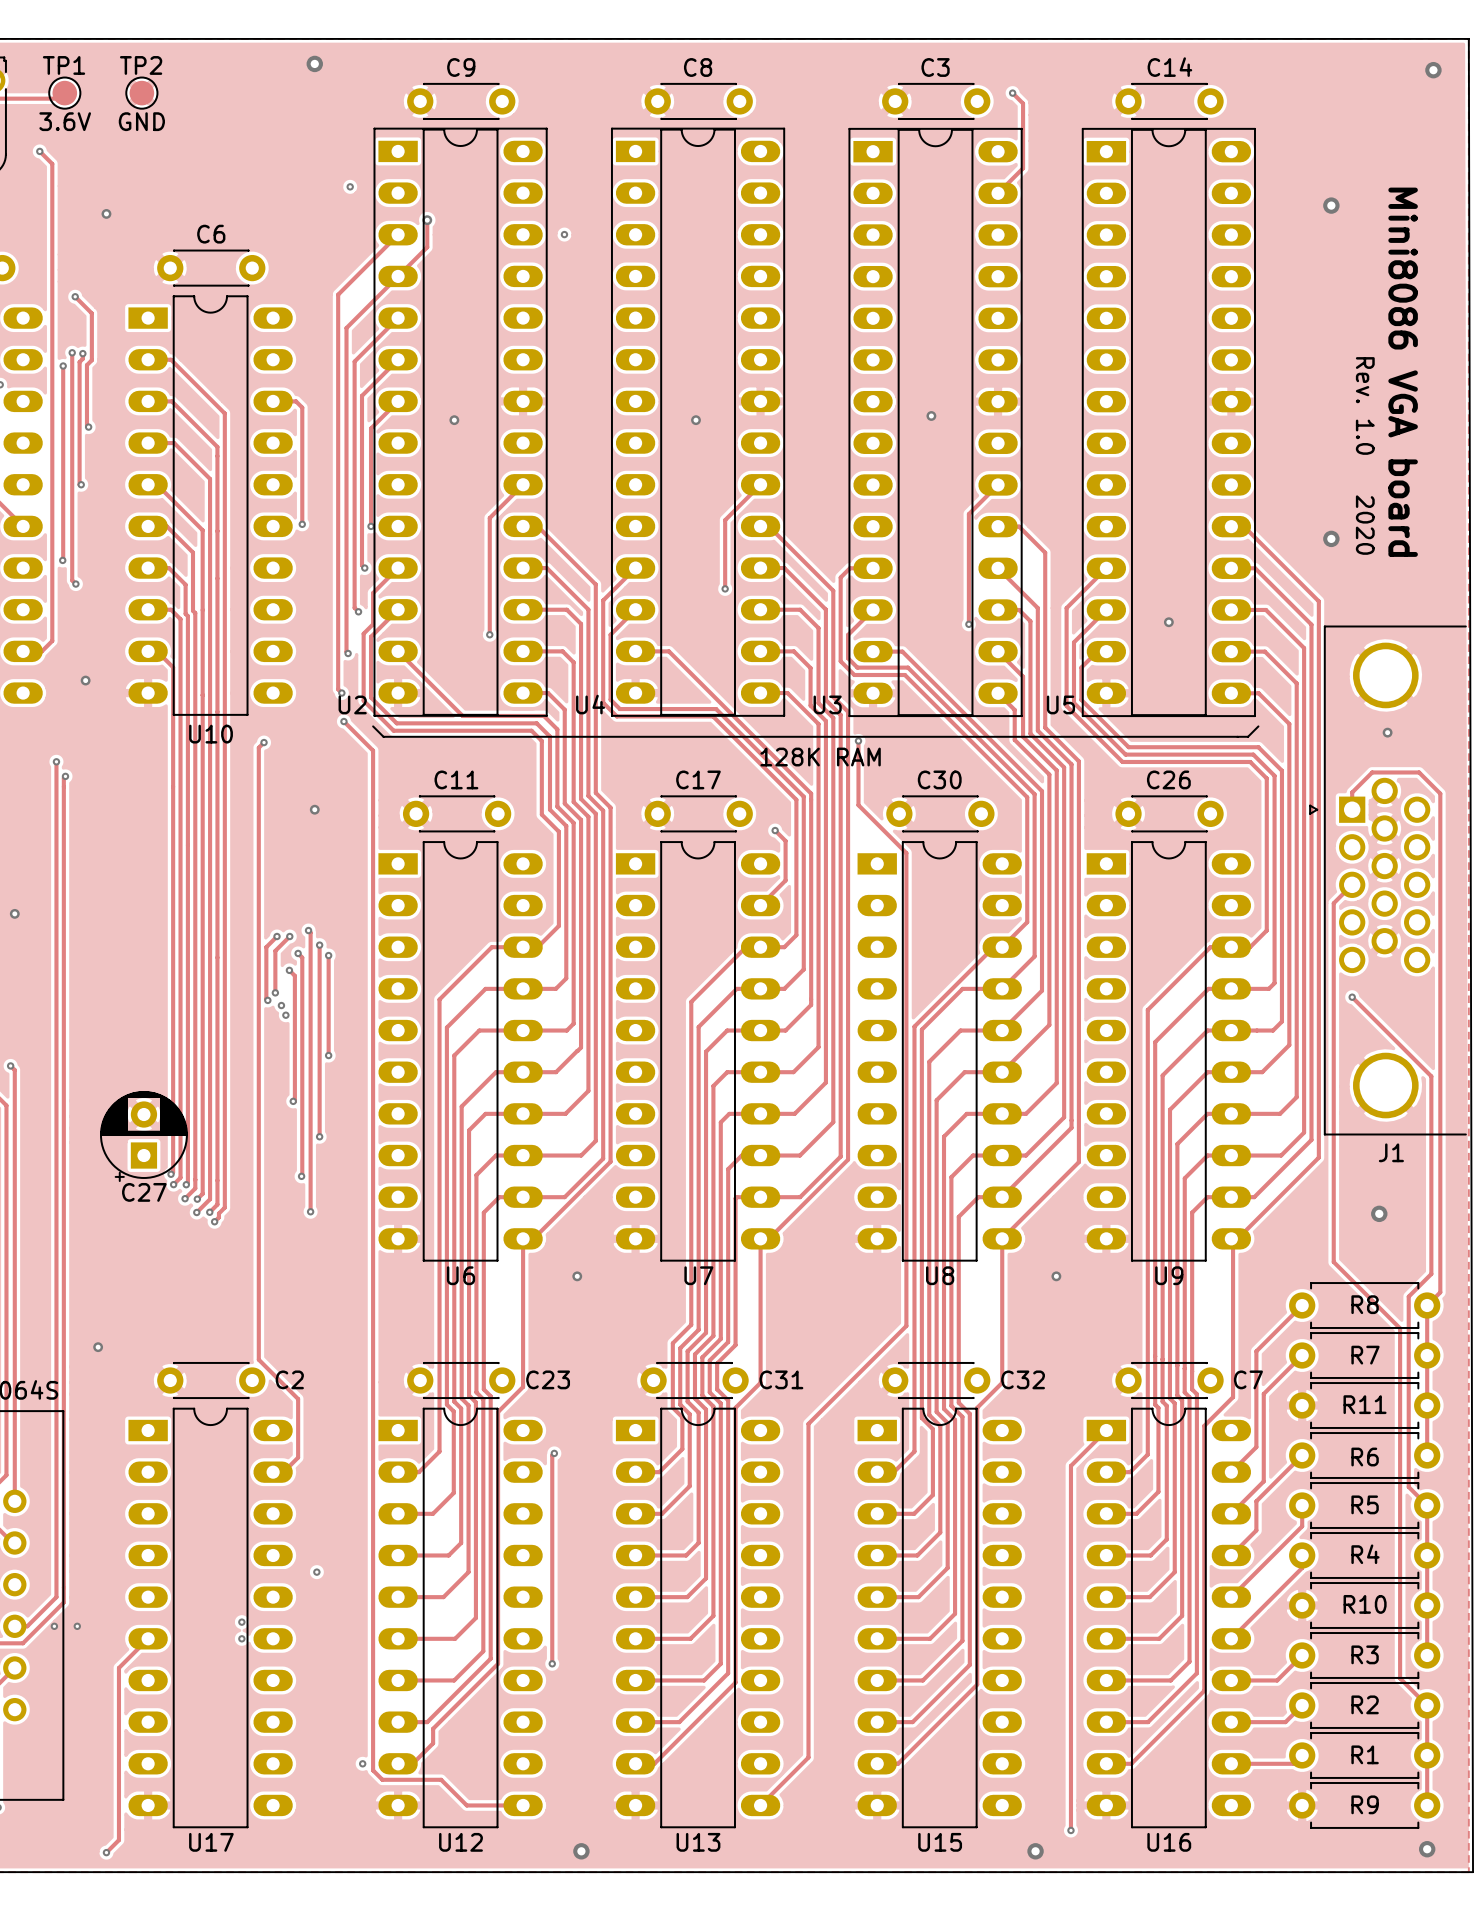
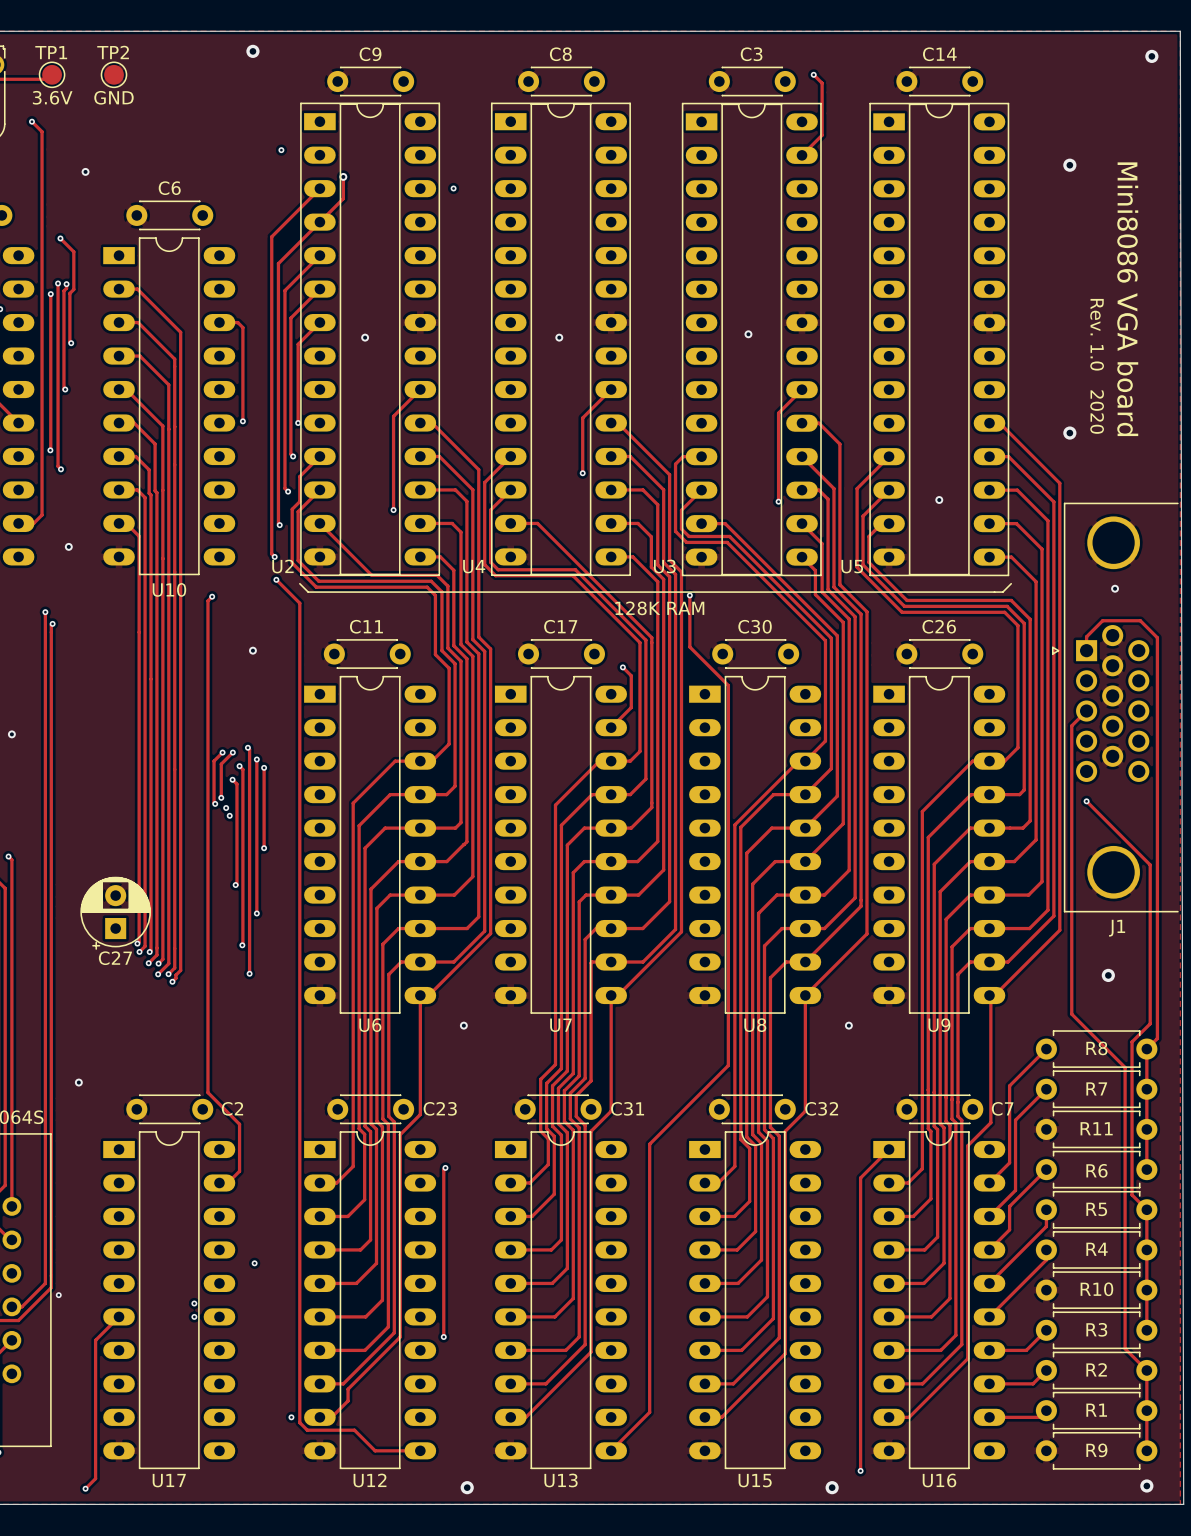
via: none -> (58, 1295)
via: (54, 1626) -> none
via: (77, 1626) -> none

